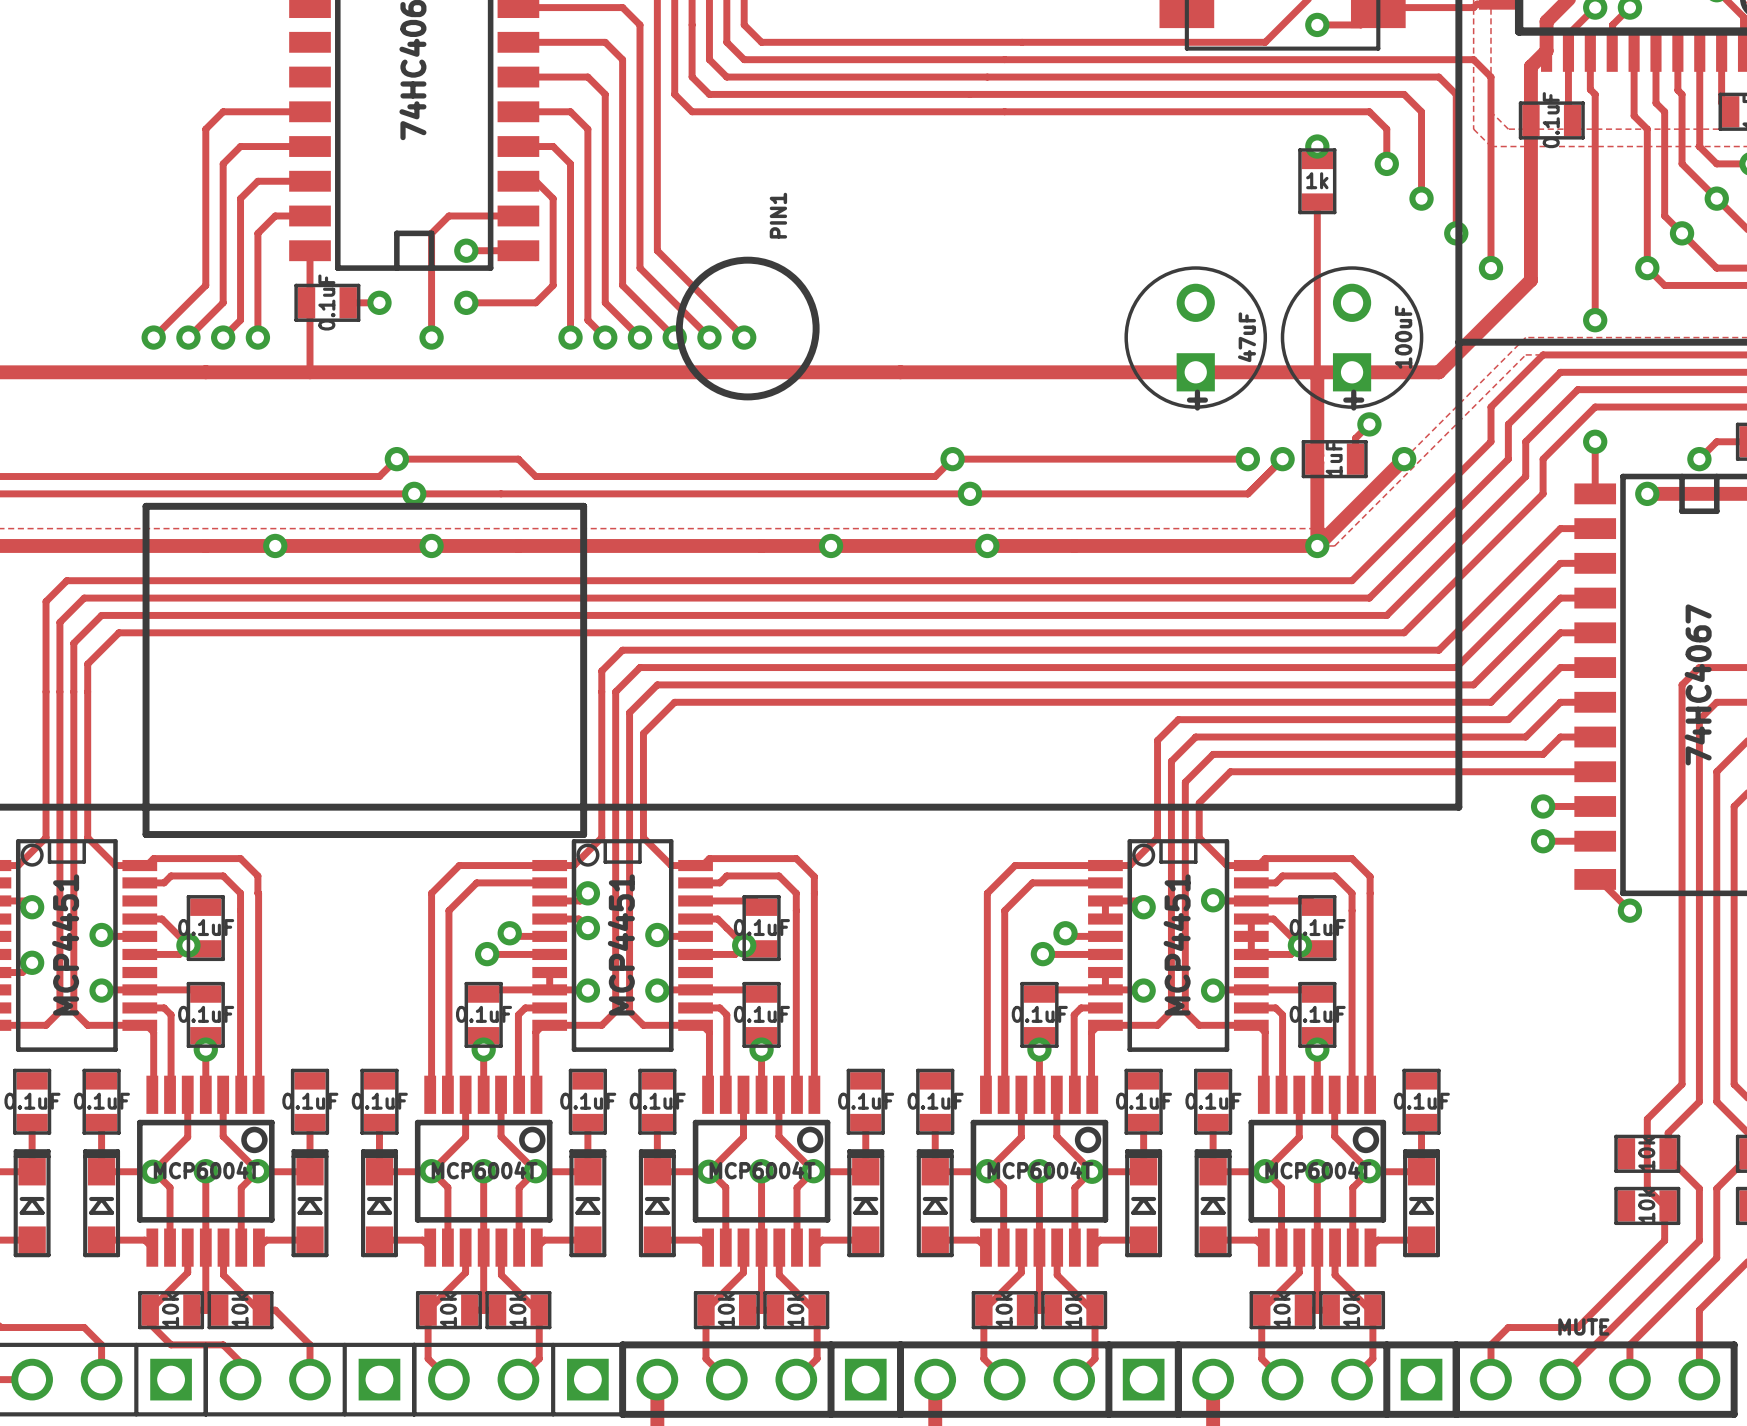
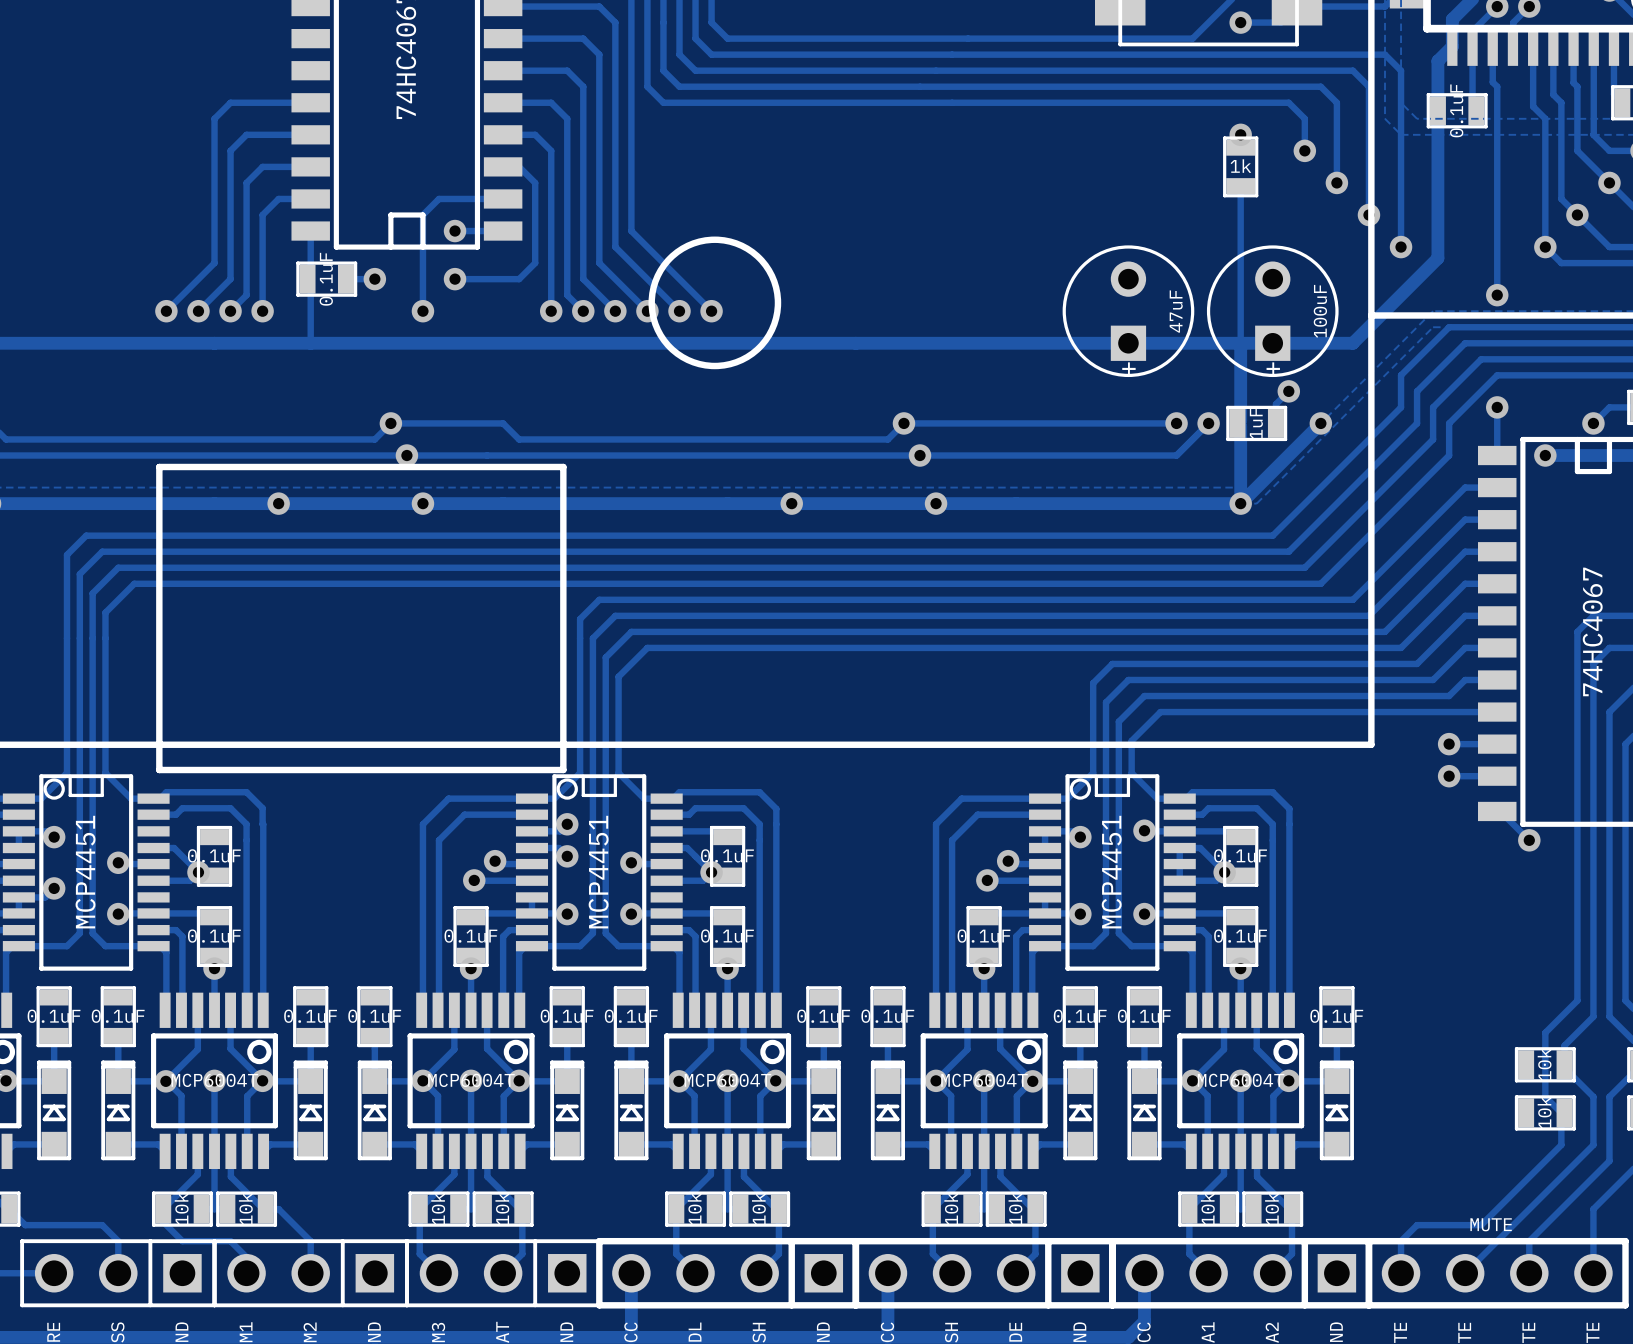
text: PIN1 (778, 215) -> none

